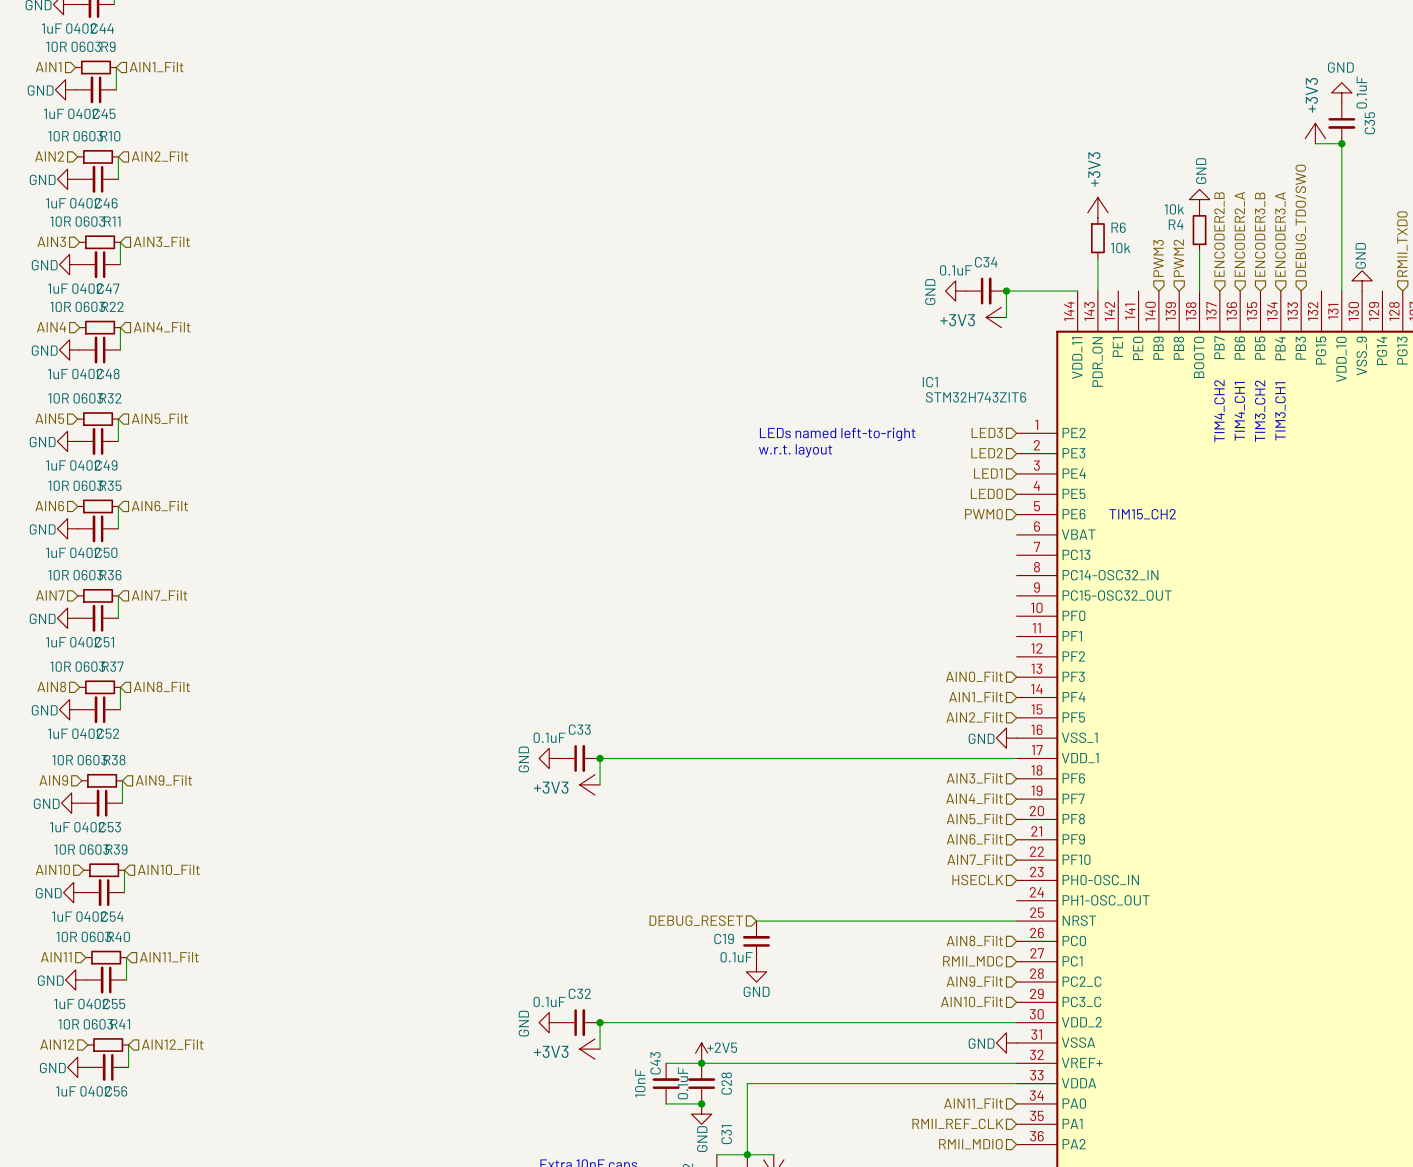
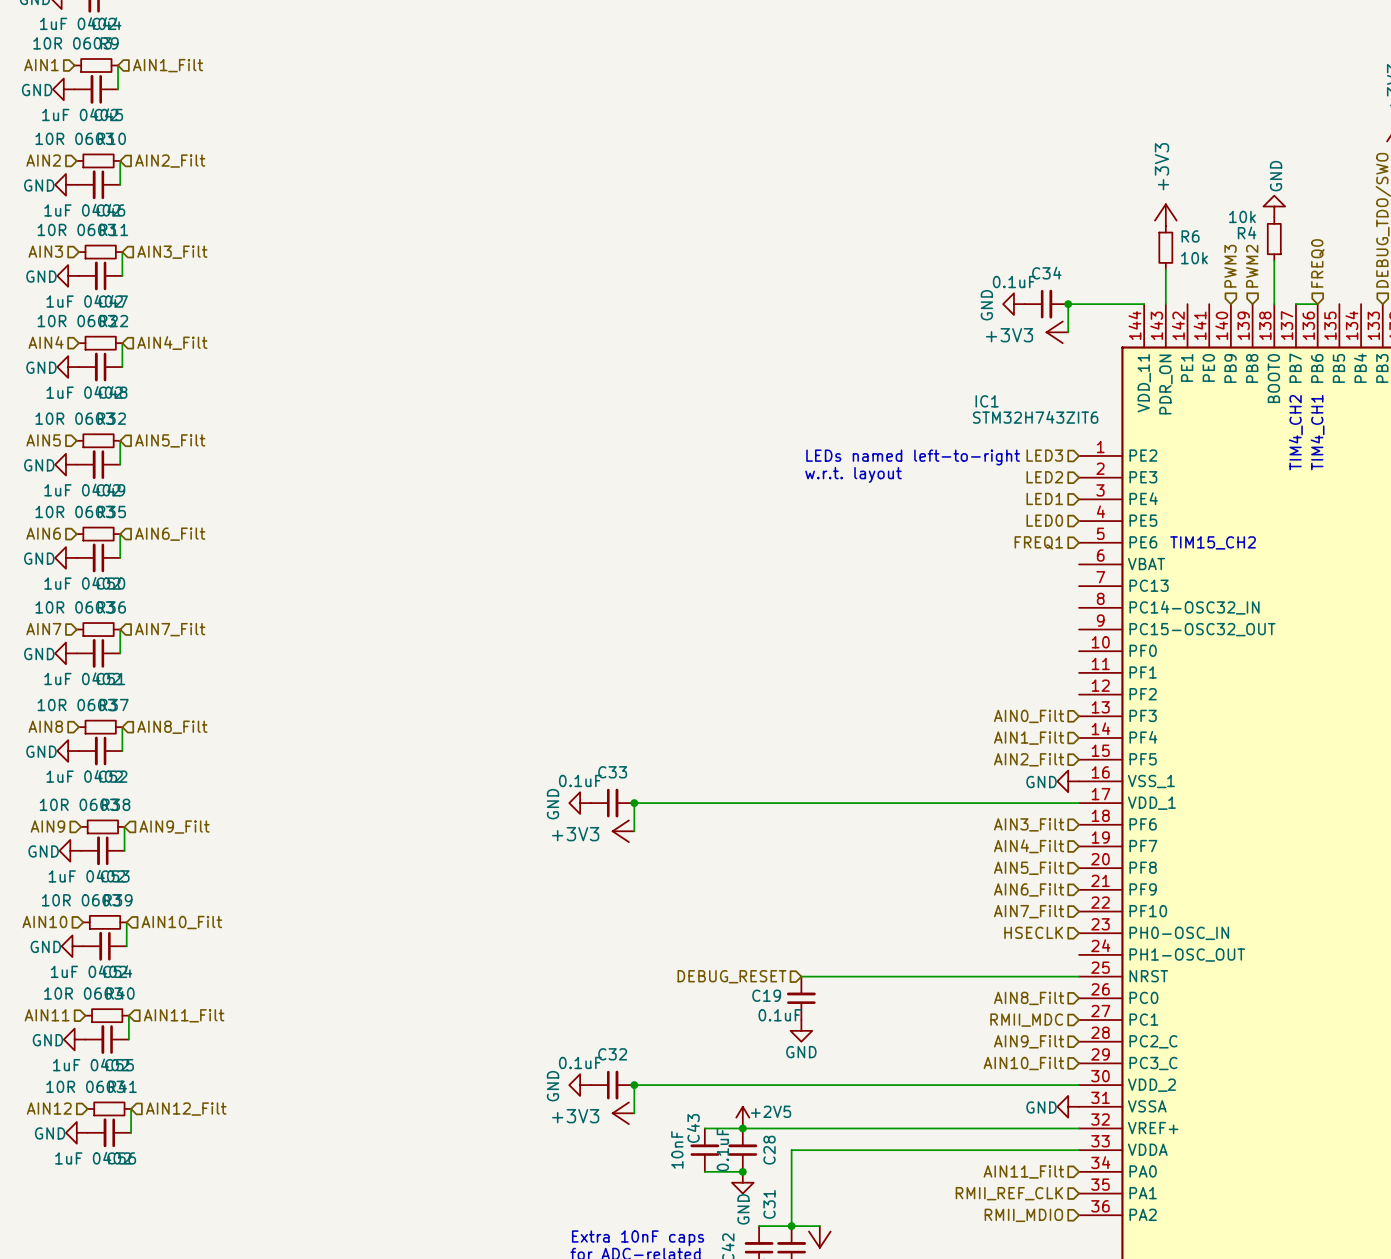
hierarchical label: ENCODER2_B (1219, 234) -> none
hierarchical label: ENCODER2_A (1239, 234) -> FREQ0 (1317, 263)
hierarchical label: ENCODER3_B (1260, 234) -> none
hierarchical label: ENCODER3_A (1280, 234) -> none
wire: none -> (1295, 304) (1317, 304)
text: TIM3_CH2 (1260, 411) -> none
text: TIM3_CH1 (1280, 411) -> none
hierarchical label: PWM0 (983, 514) -> FREQ1 (1038, 542)

